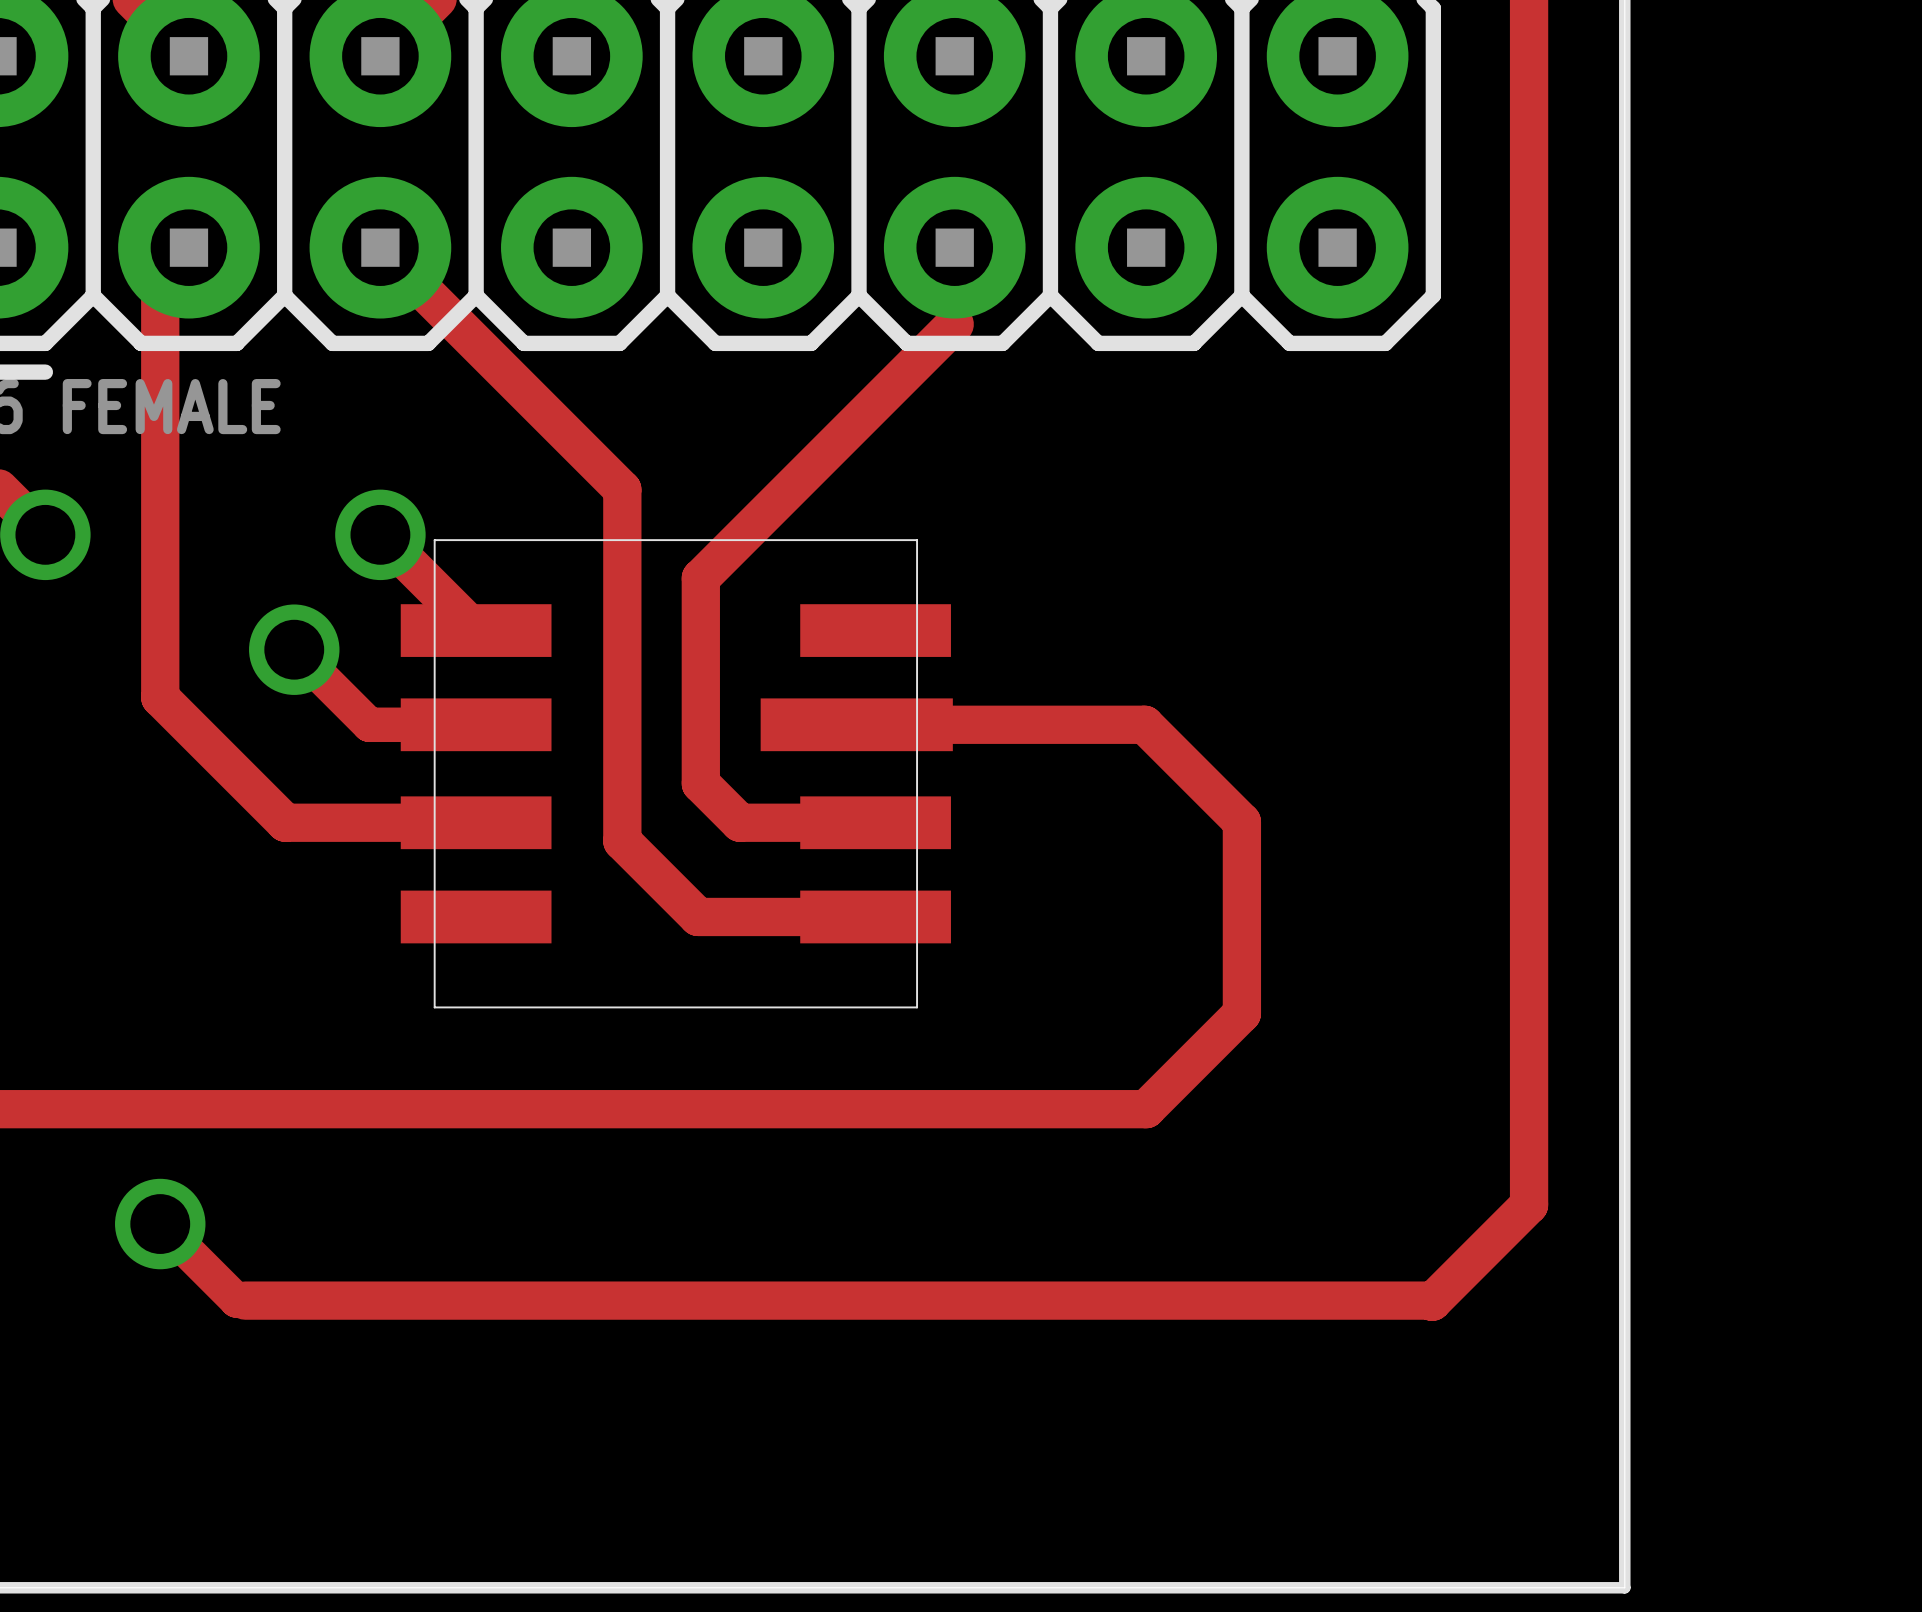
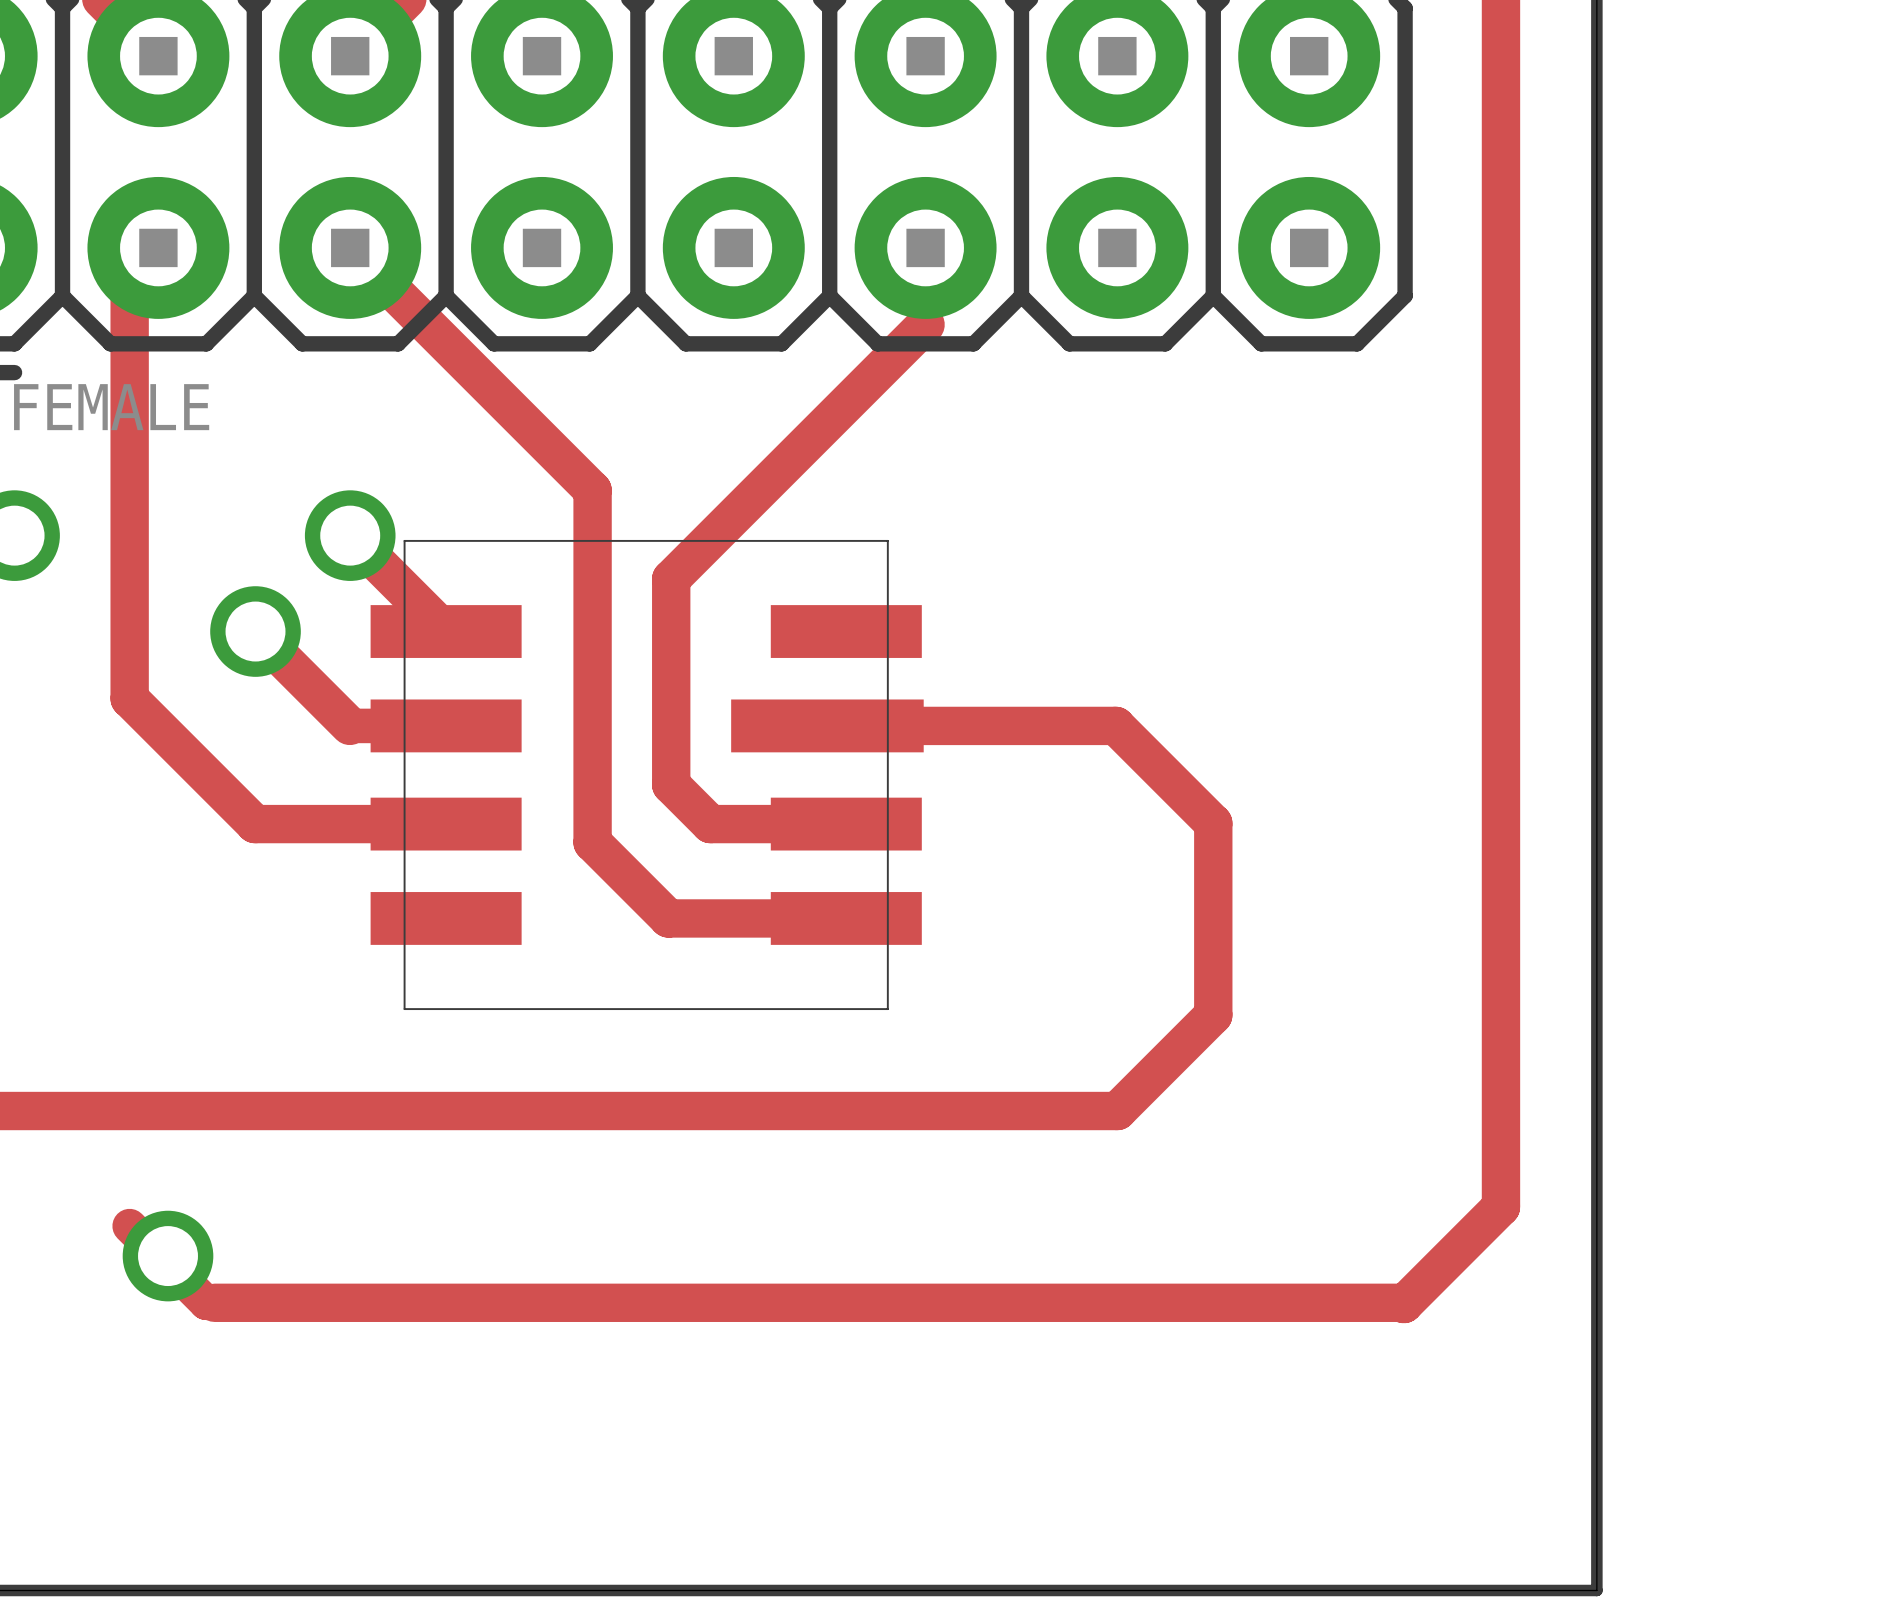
track: (294, 649) (369, 724) (380, 724) -> (255, 631) (349, 725)
via position: (294, 649) -> (255, 631)
via position: (160, 1224) -> (168, 1256)

